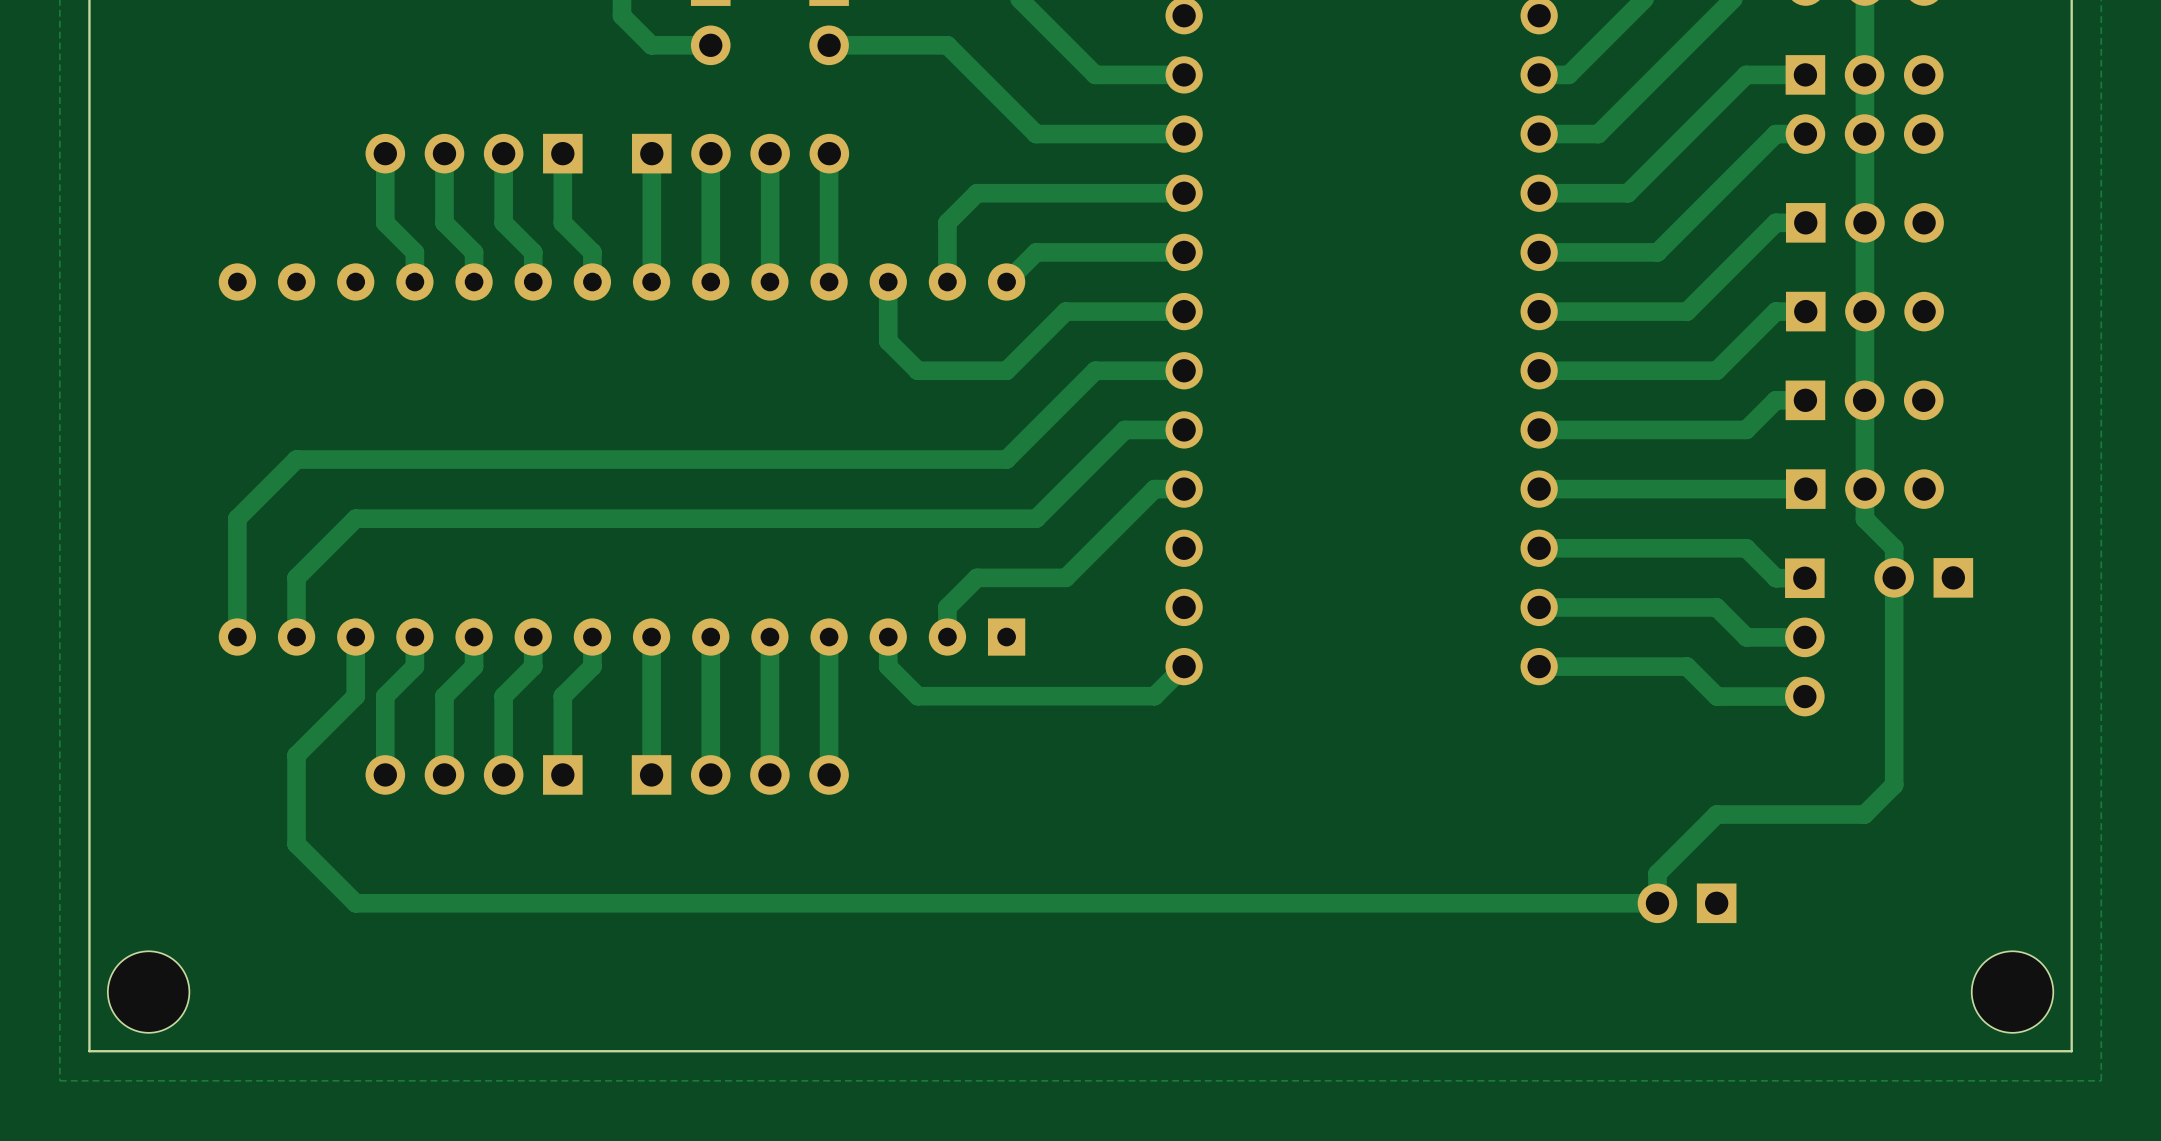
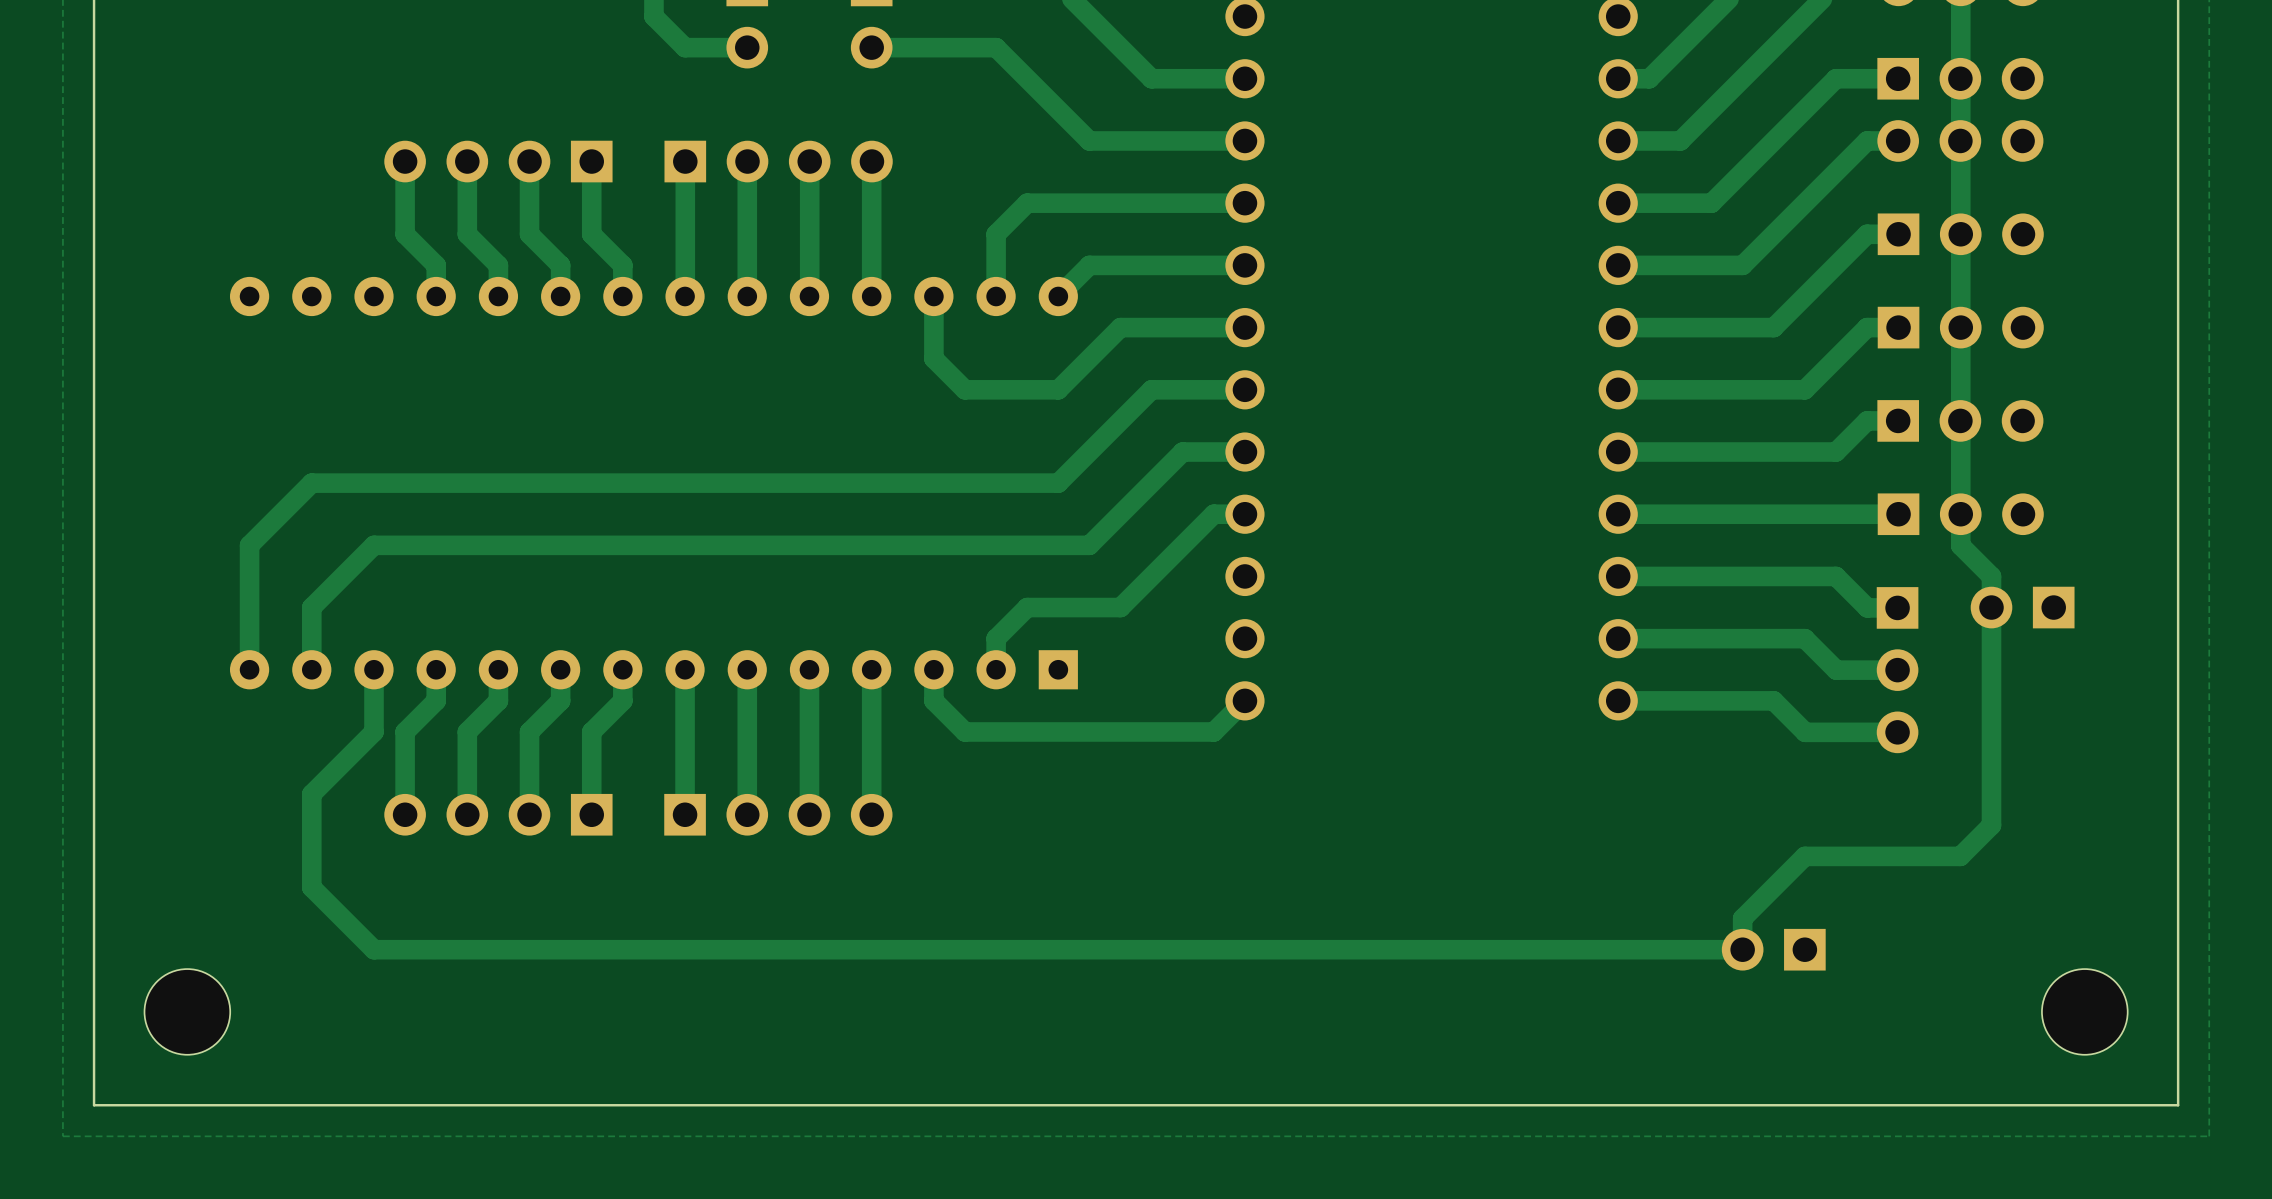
part position: (148, 992) -> (187, 1011)
part position: (2012, 992) -> (2084, 1011)

